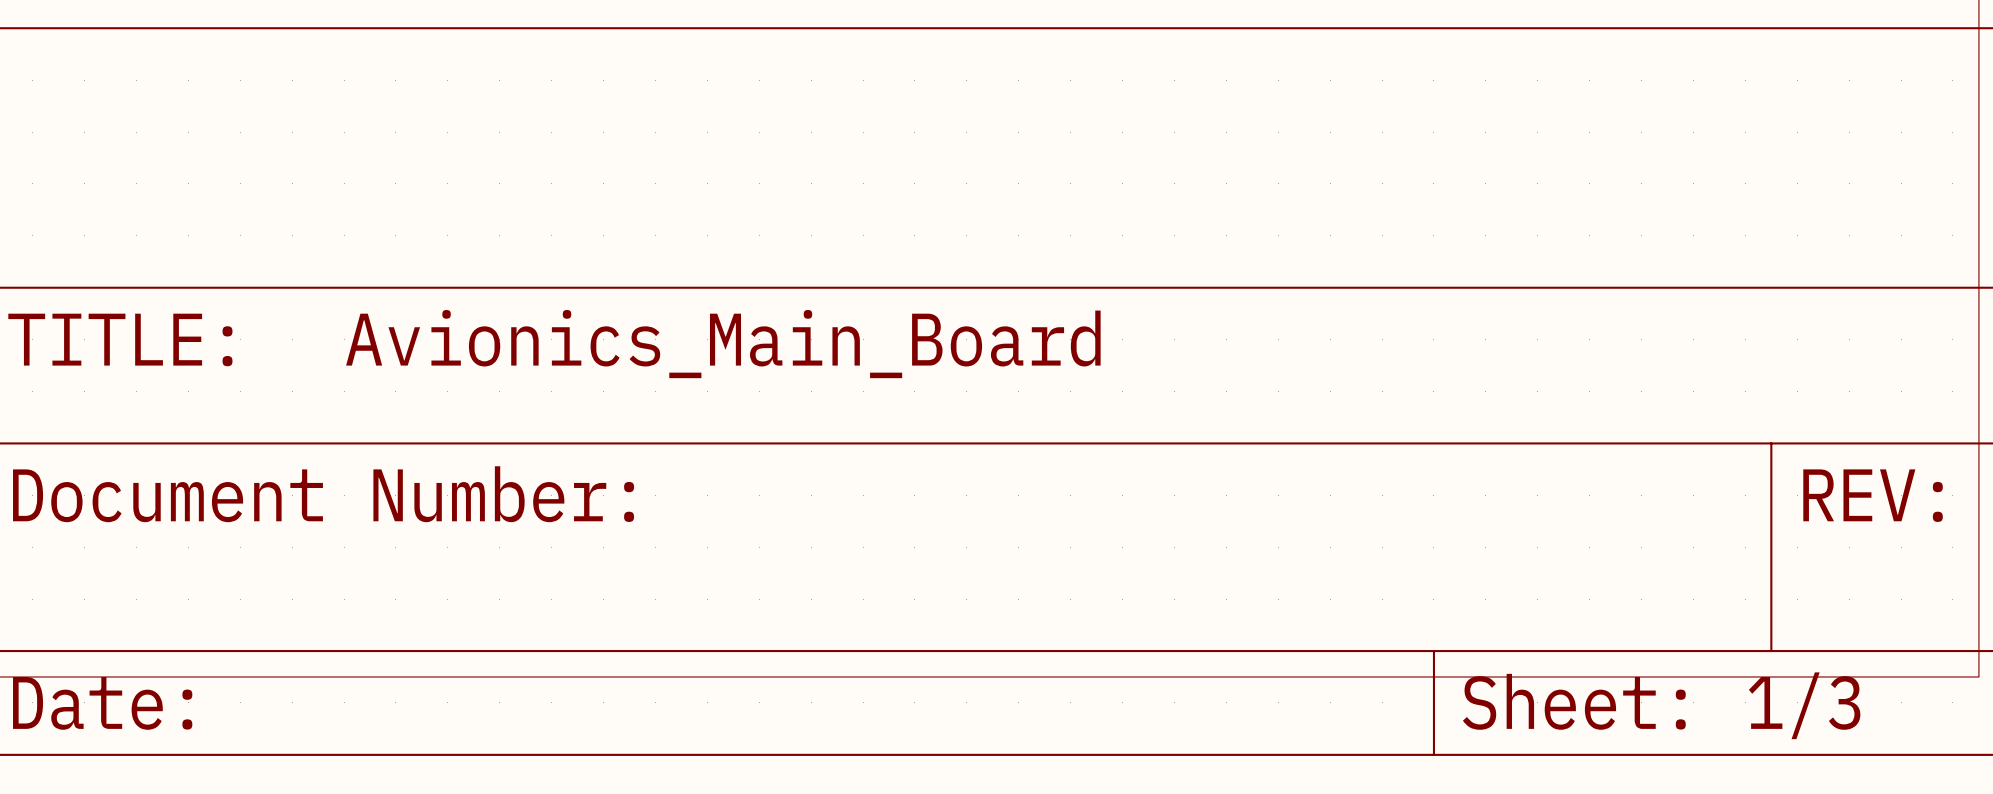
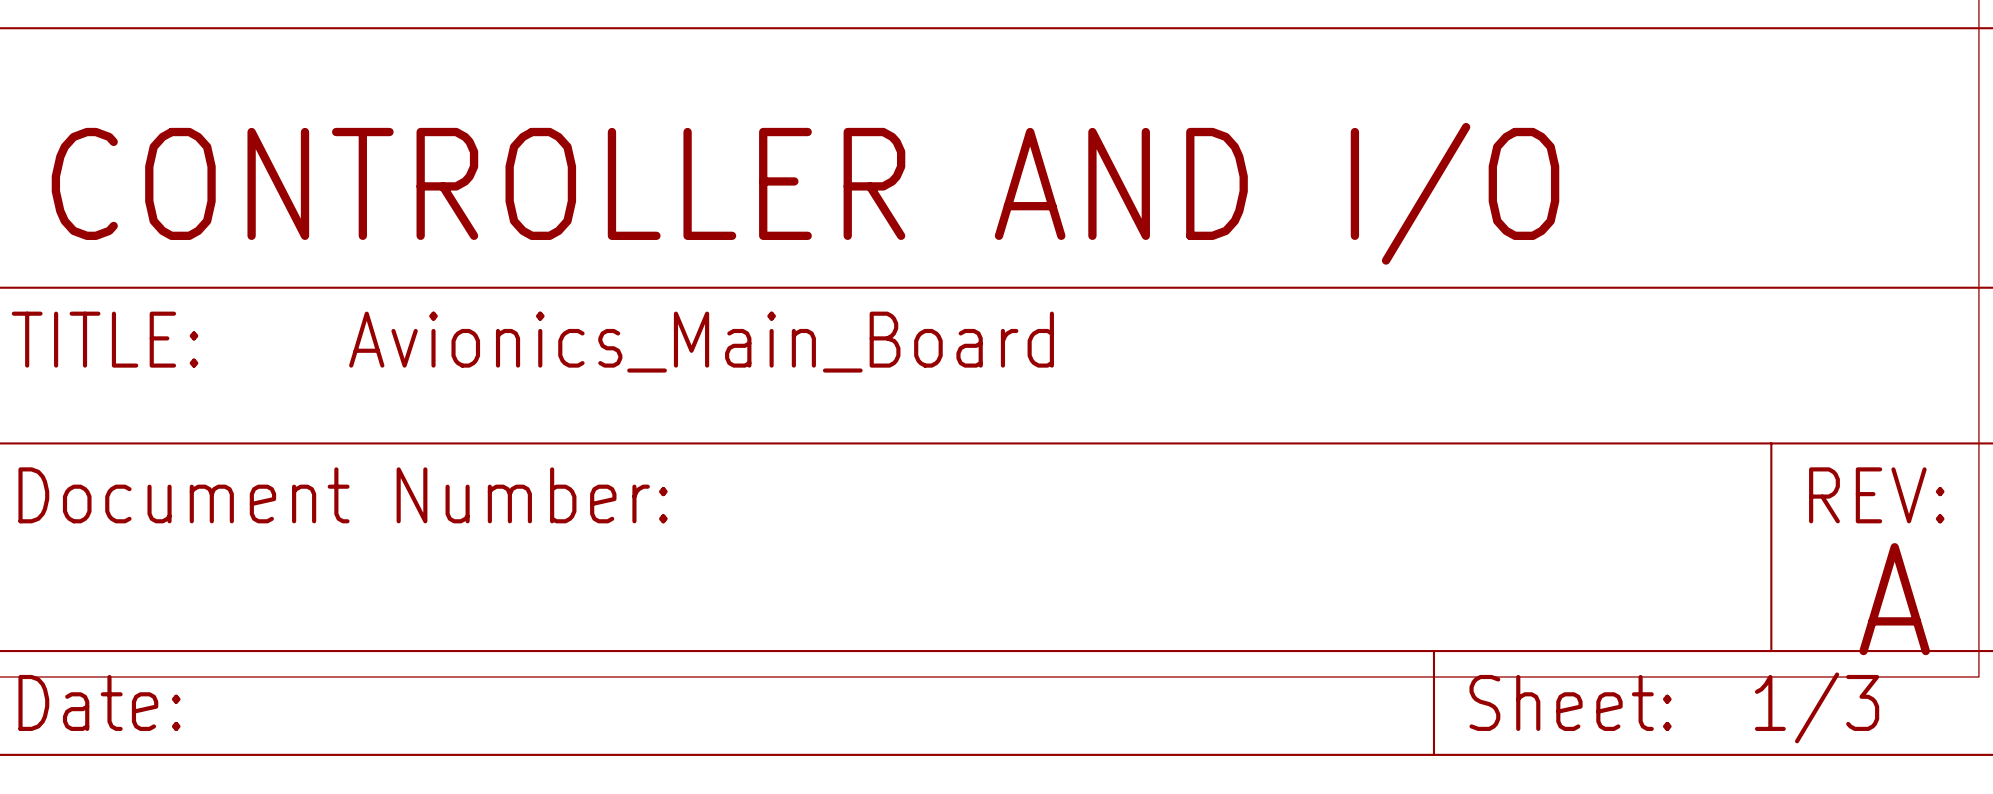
text: none -> CONTROLLER AND I/O (805, 193)
text: none -> A (1894, 599)

